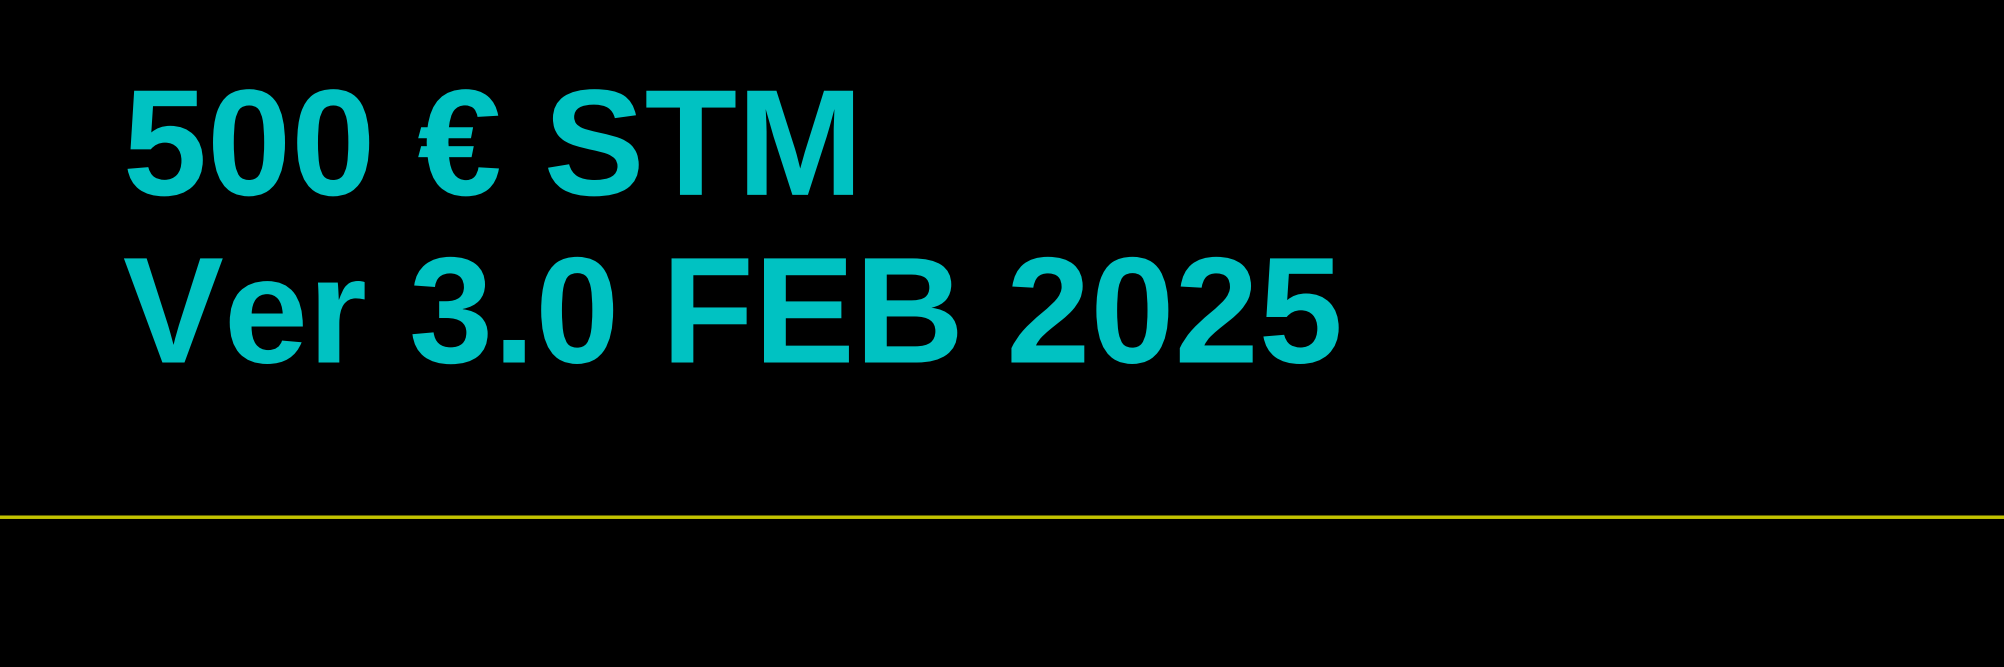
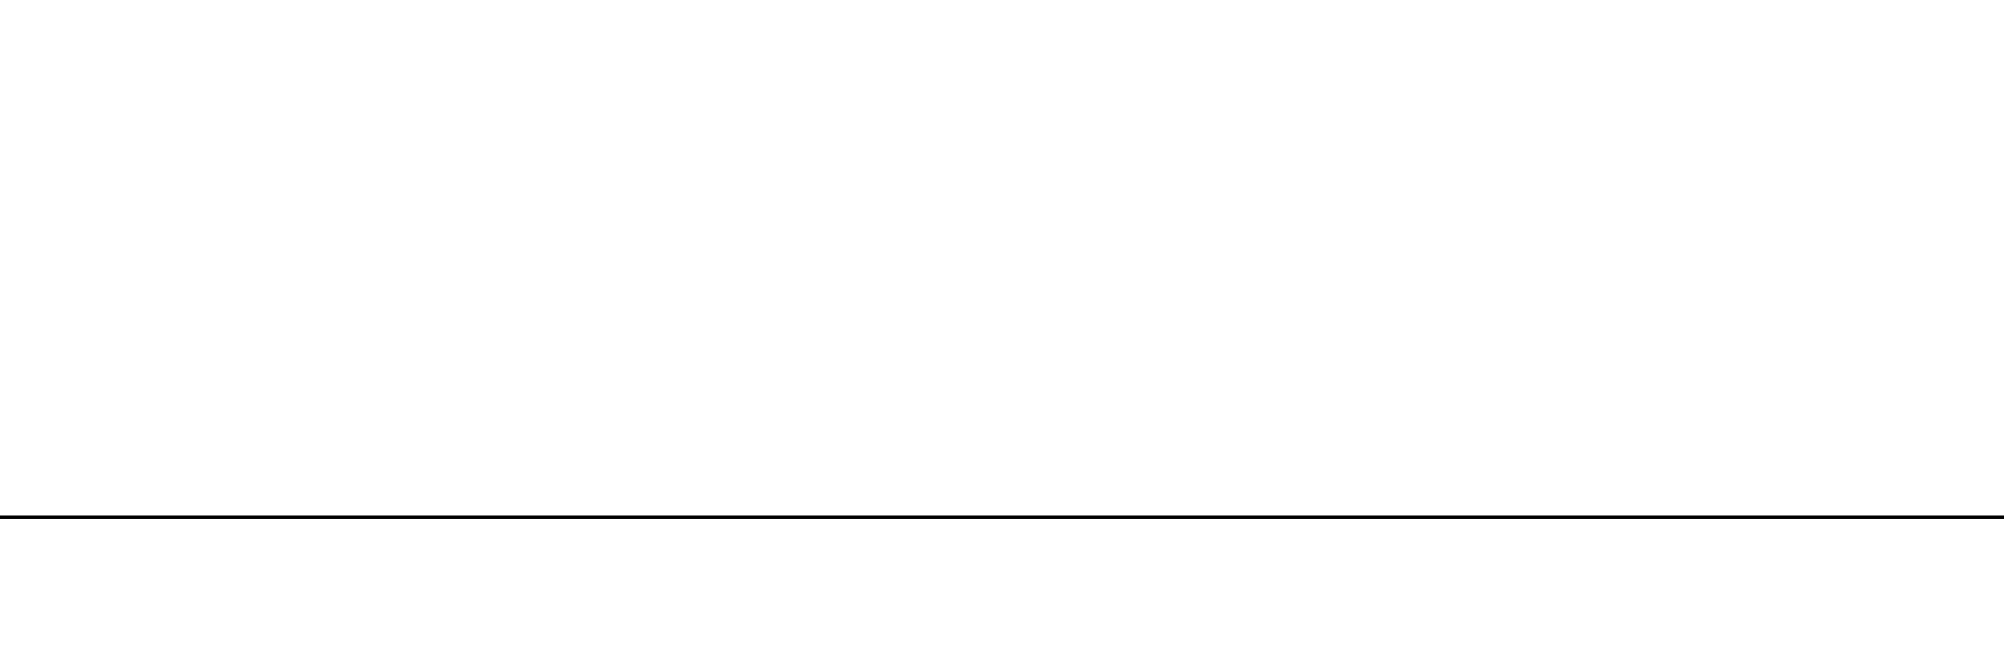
text: 500 € STM (490, 142) -> none
text: Ver 3.0 FEB 2025 (731, 310) -> none

